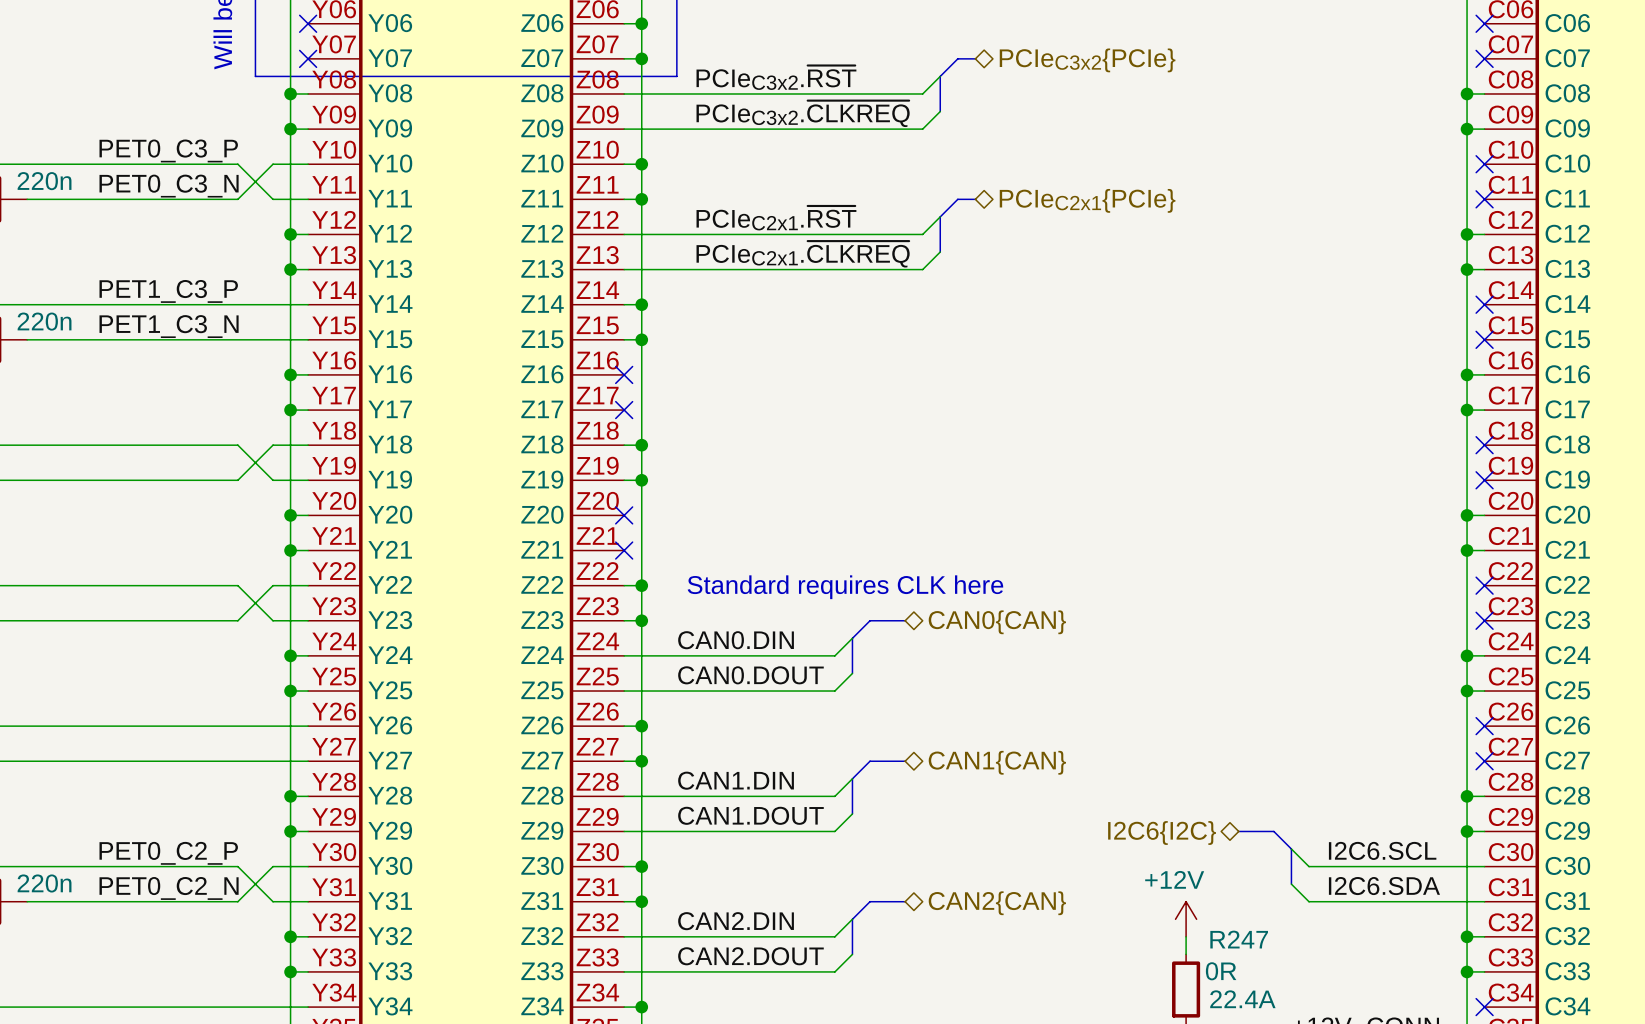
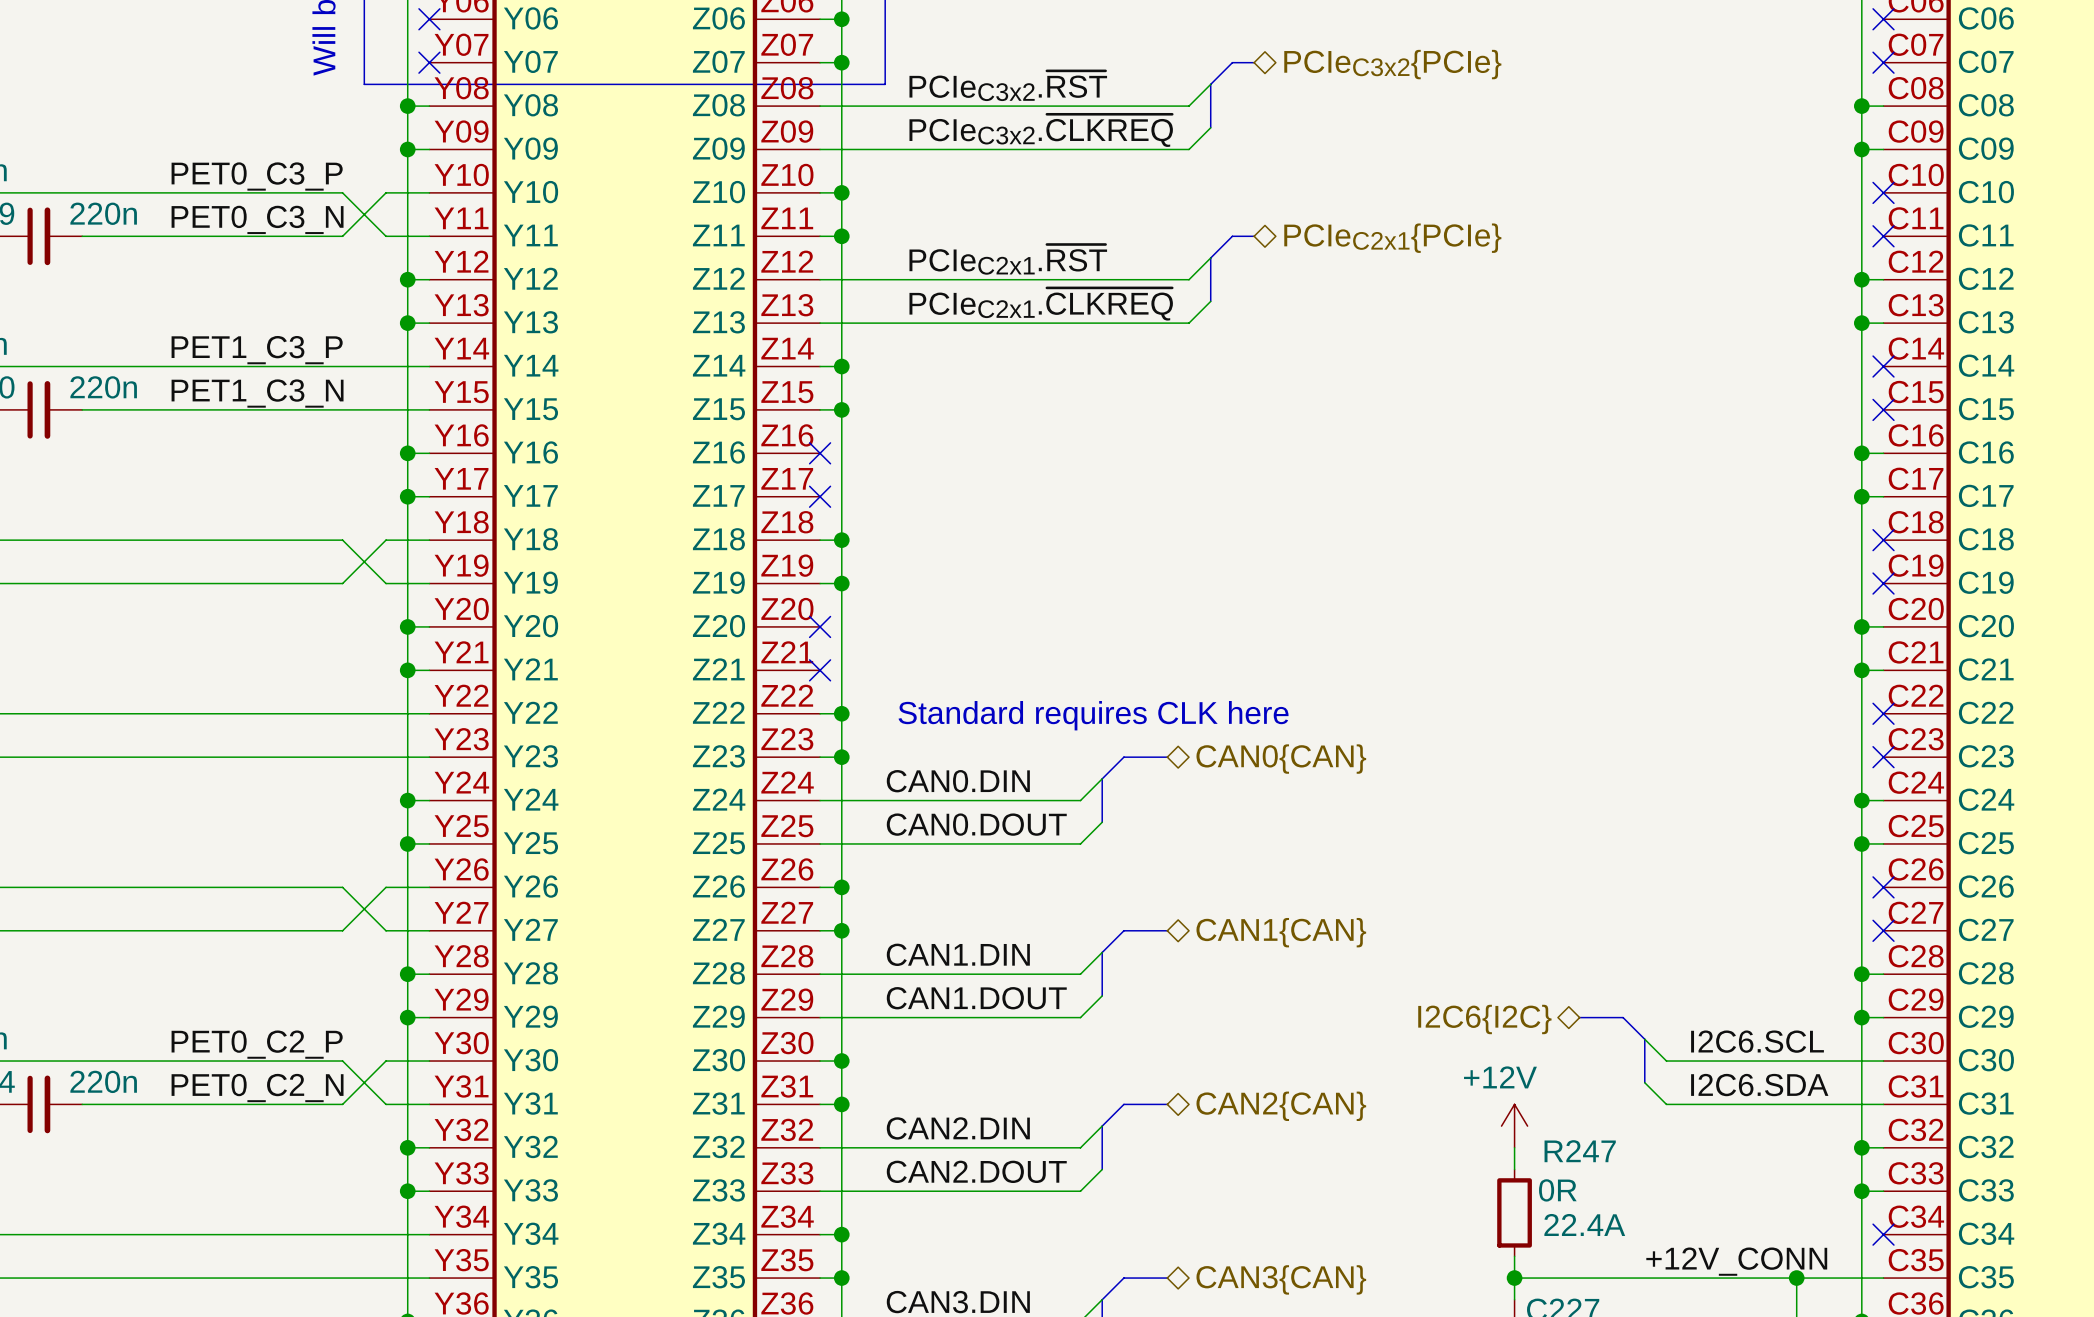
wire: (237, 585) (273, 620) -> (342, 713) (386, 713)
wire: (273, 585) (237, 620) -> (386, 757) (342, 757)
wire: (237, 726) (273, 726) -> (342, 887) (386, 930)
wire: (237, 761) (273, 761) -> (342, 930) (386, 887)

